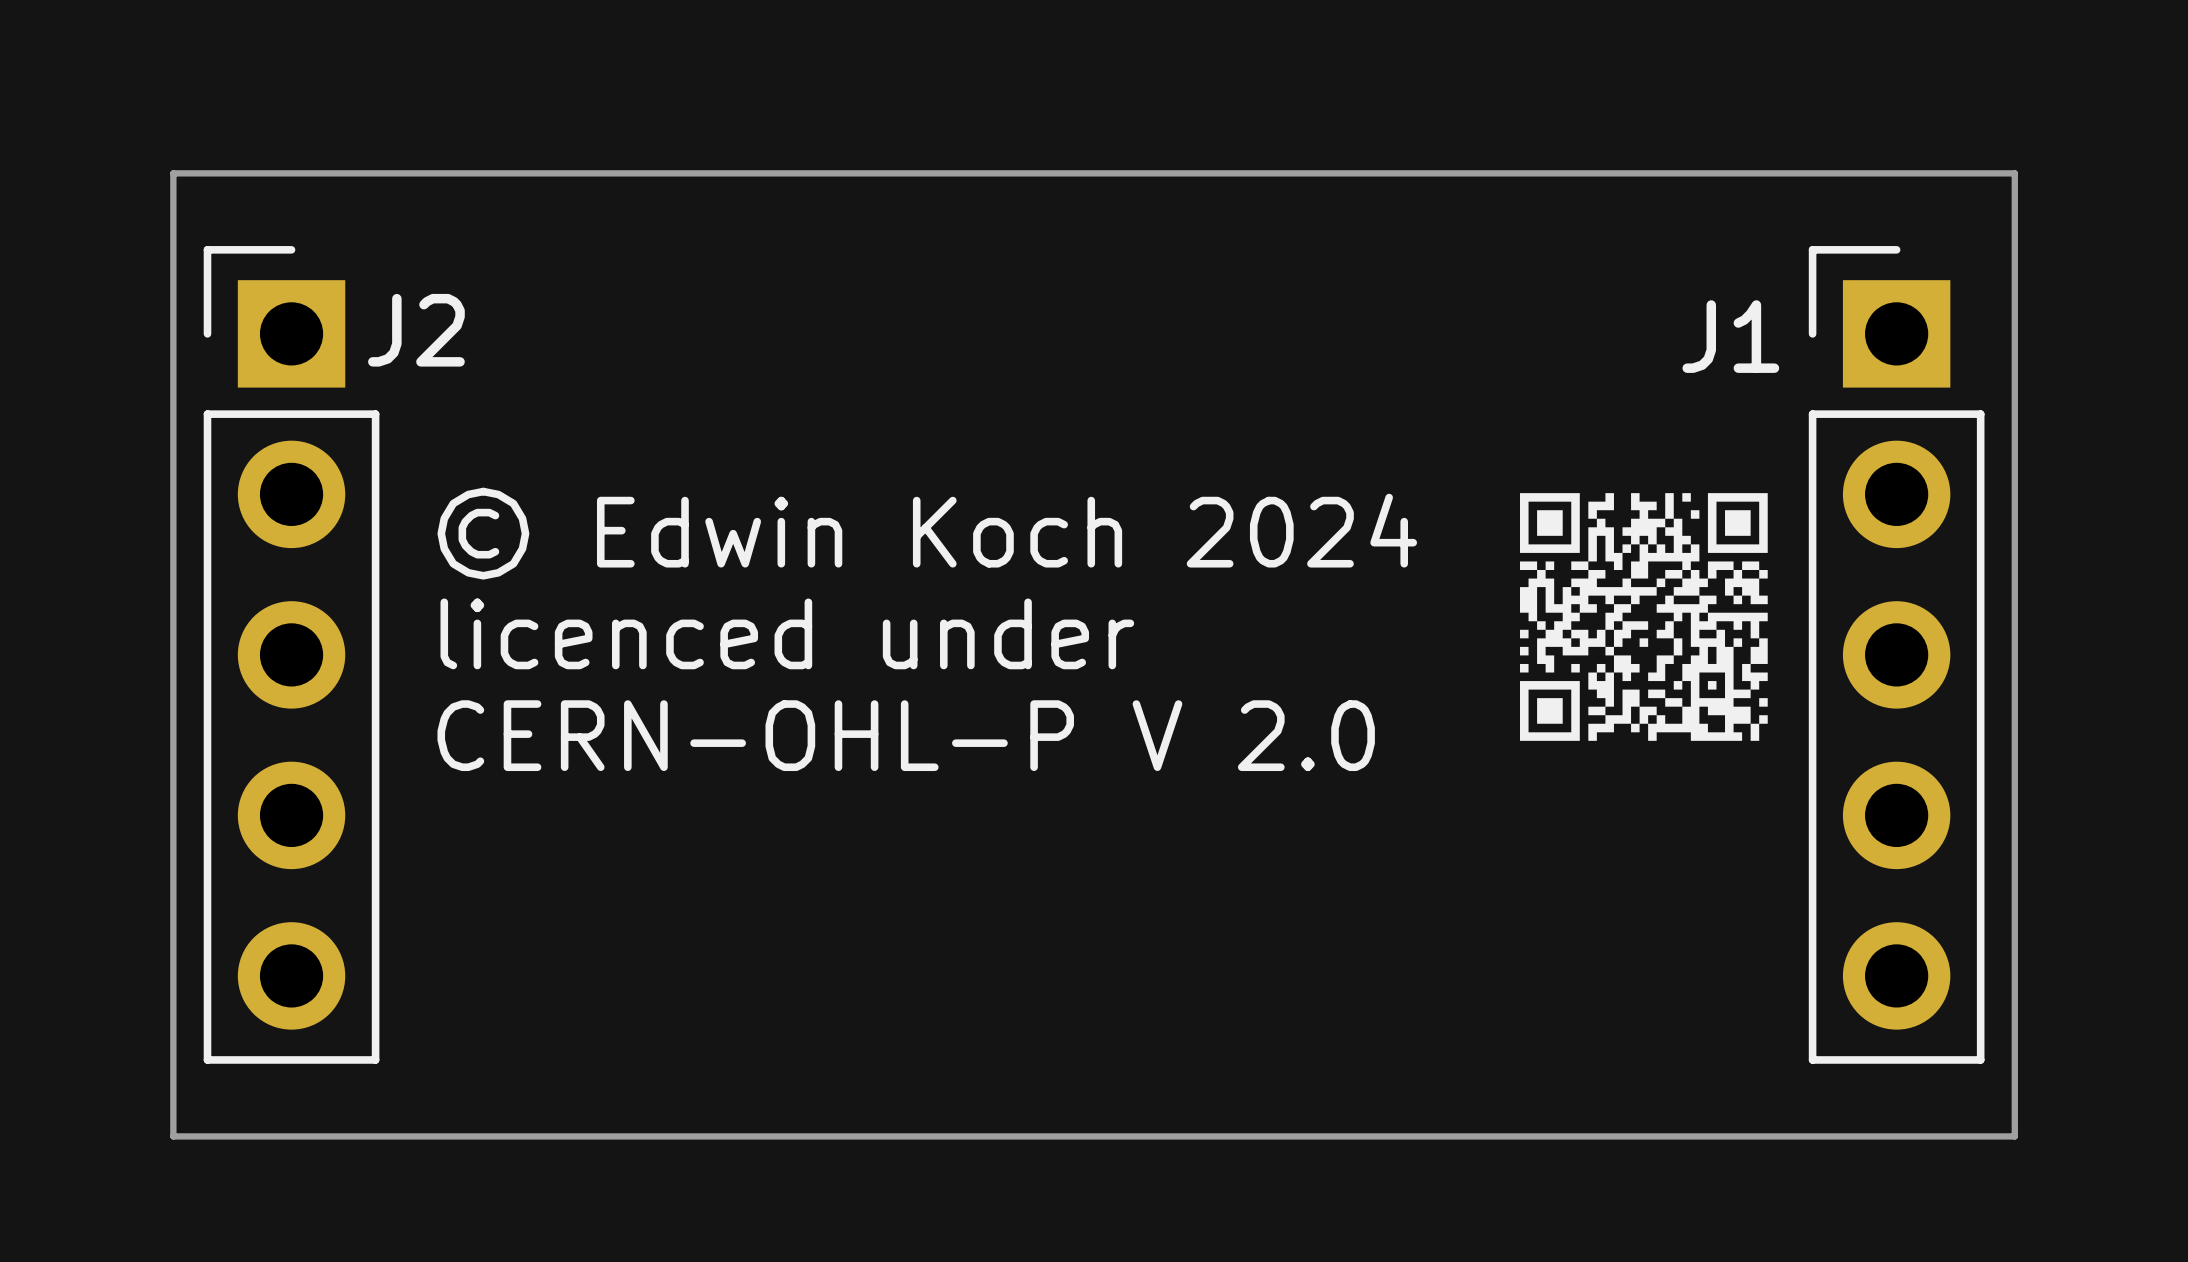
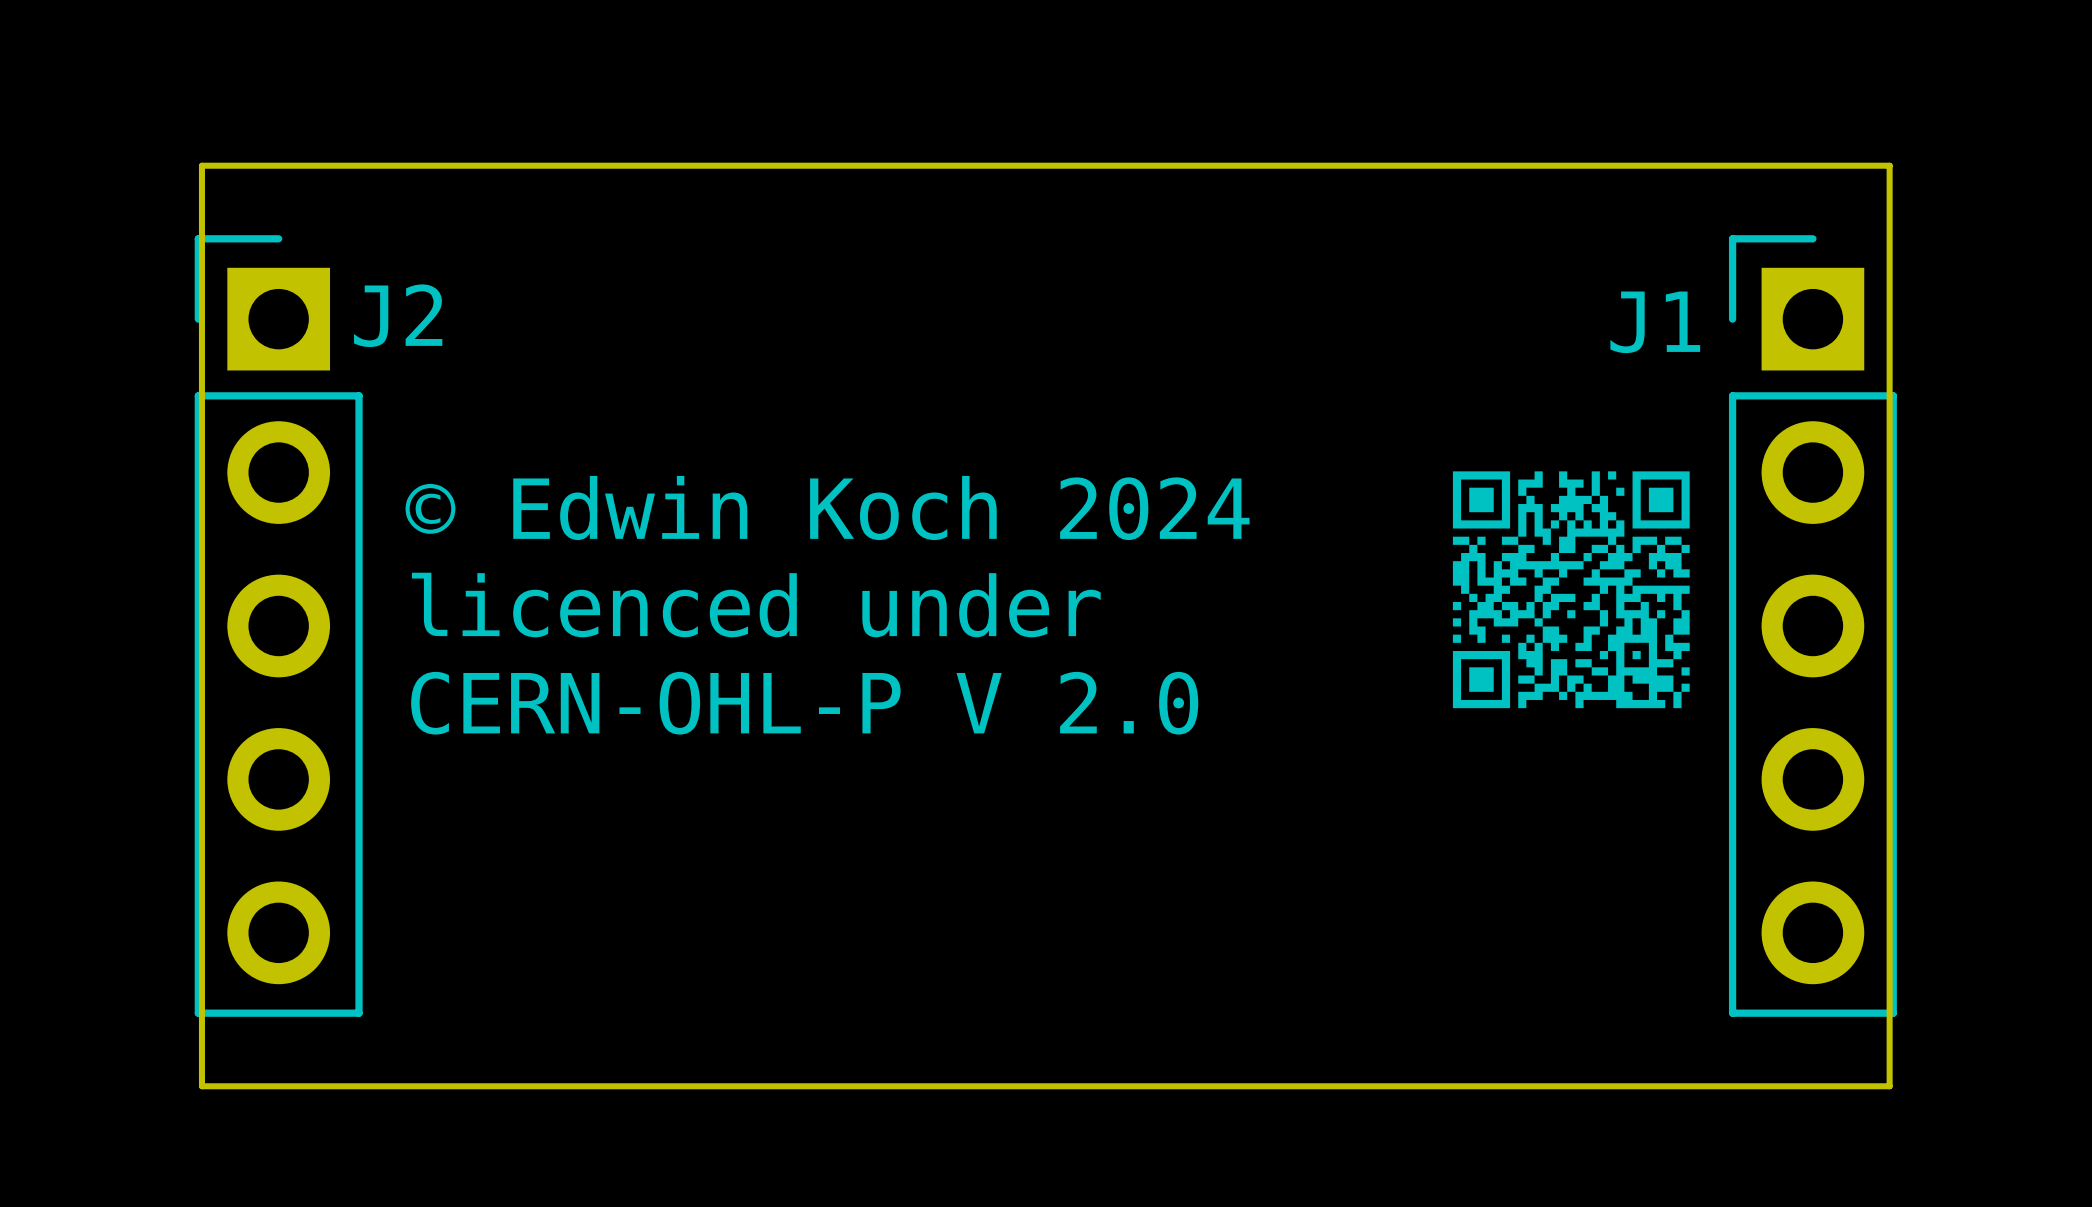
board edge: (211, 173) (173, 173) (173, 1136) (211, 1136) -> (201, 165) (201, 1086)
board edge: (1976, 173) (2014, 173) (2014, 1136) (1976, 1136) -> (1889, 165) (1889, 1086)

